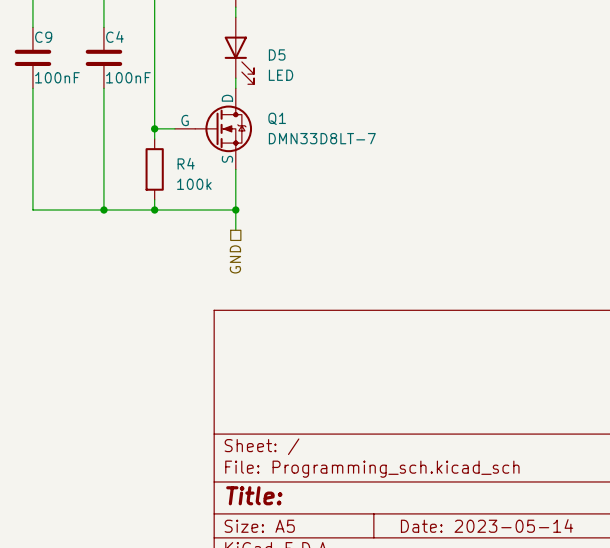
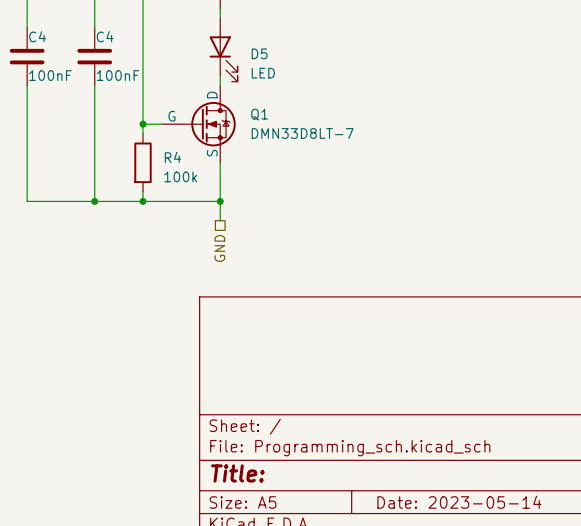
C9 name: C9 (43, 37) -> C4 (37, 36)

